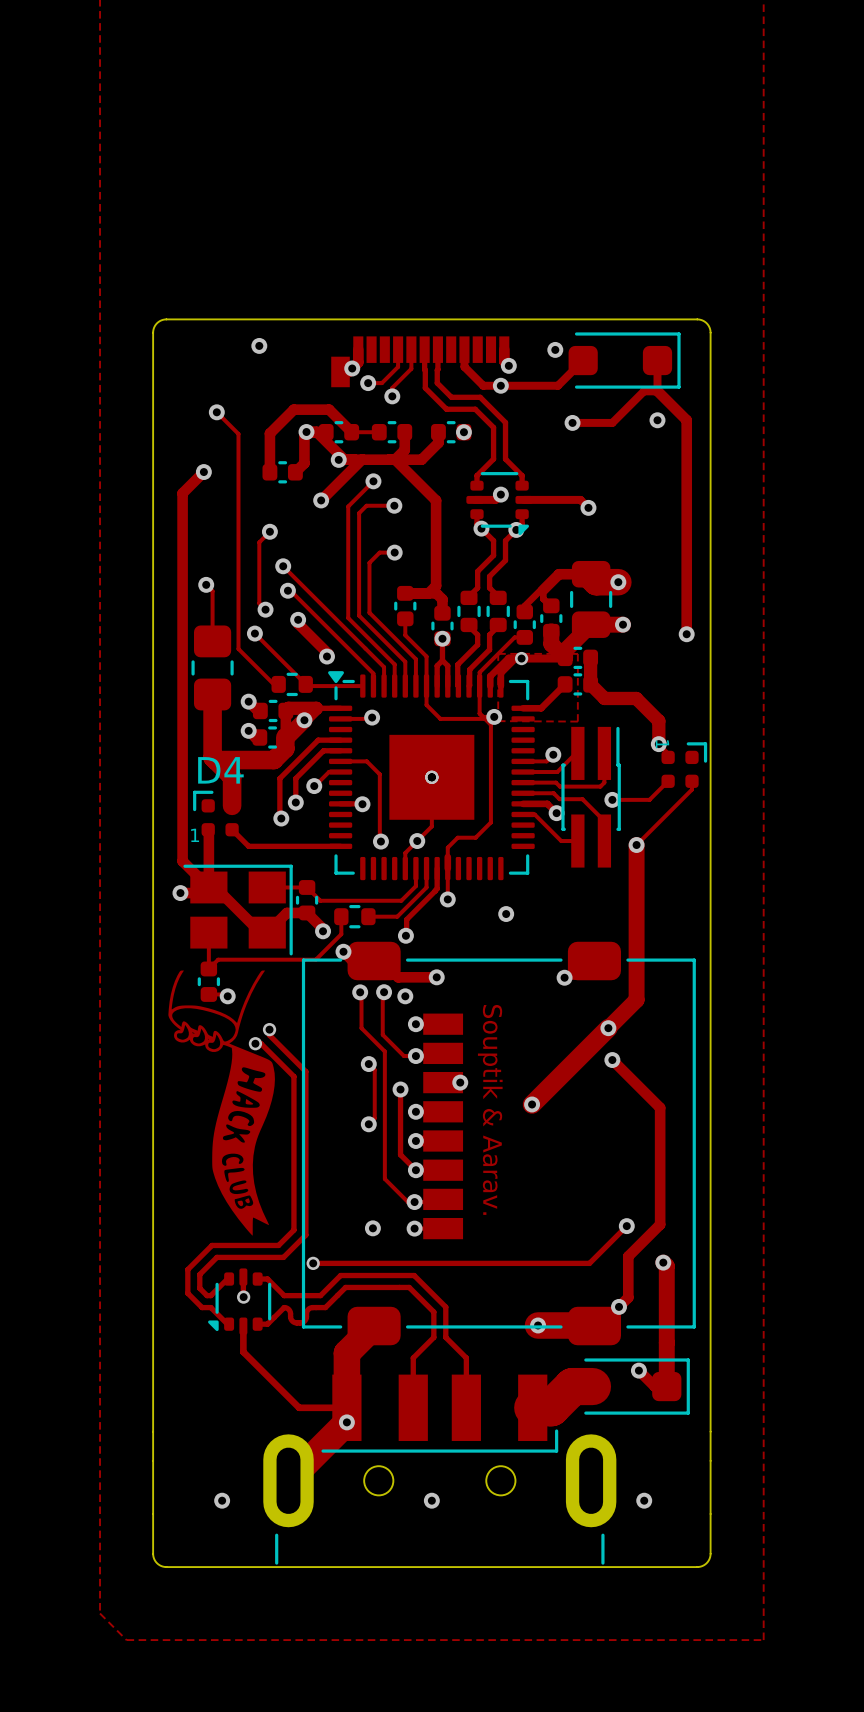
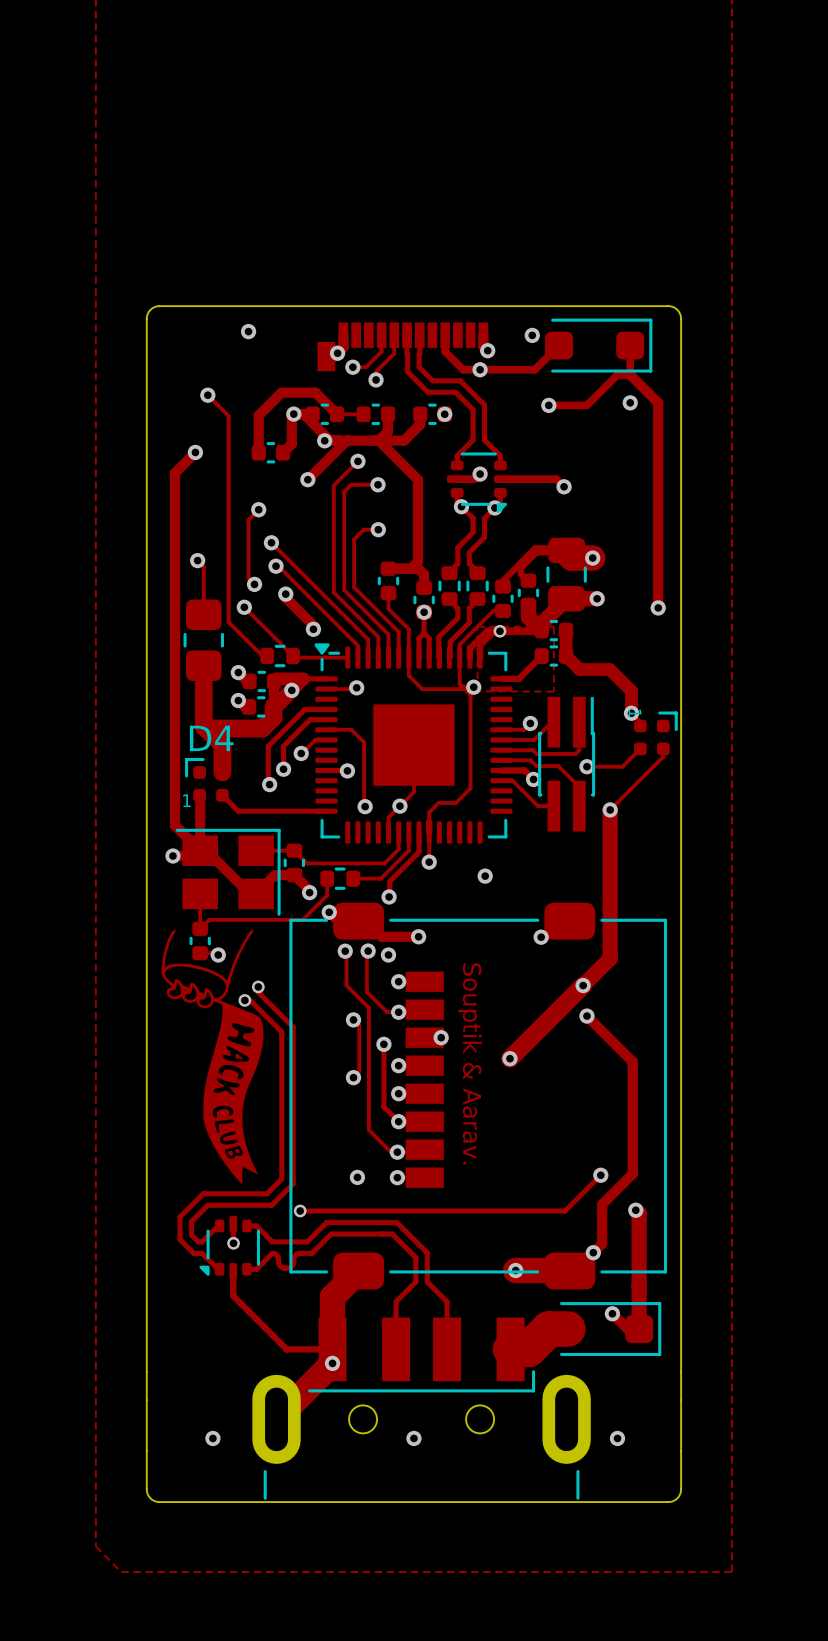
via: (431, 777) -> none

